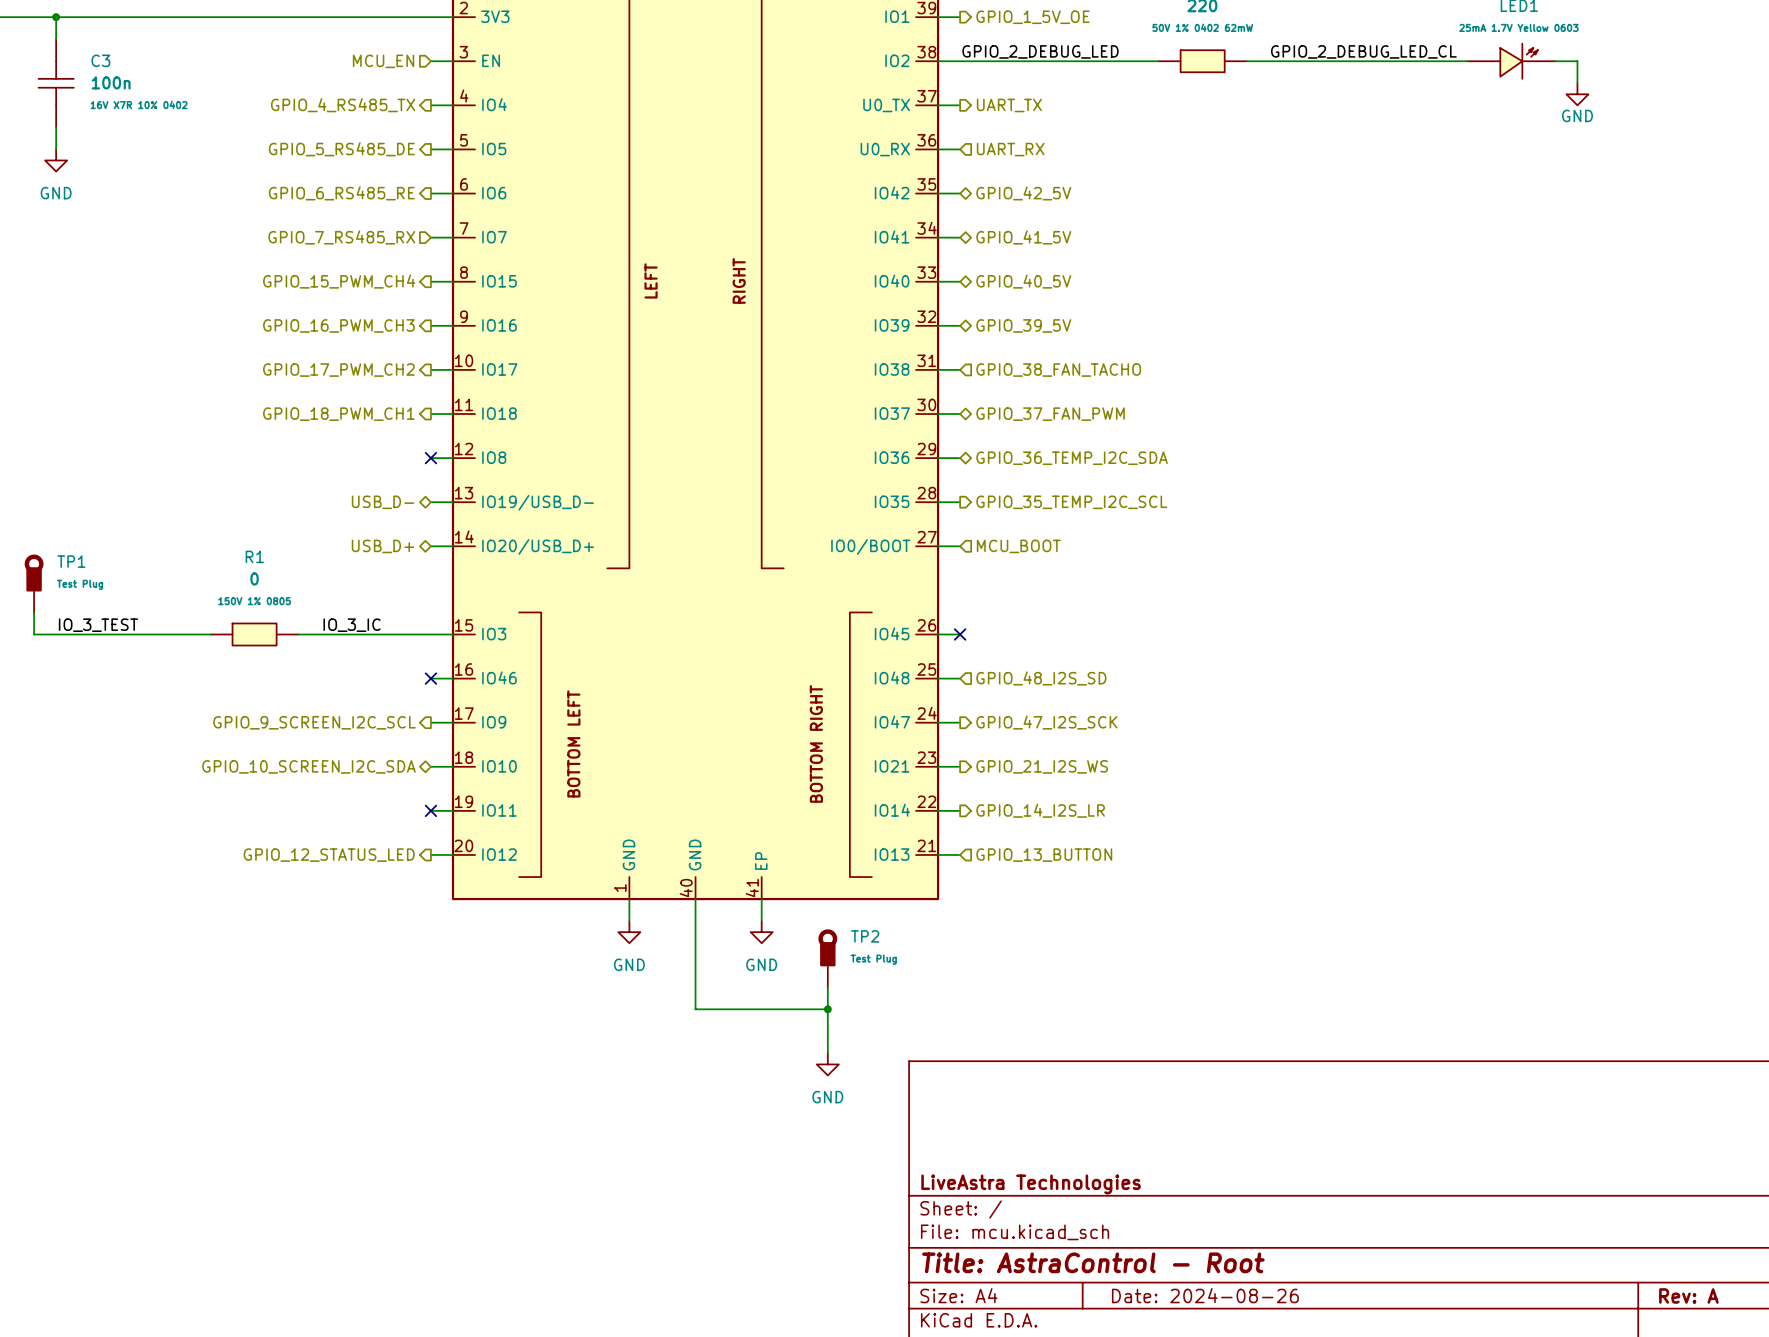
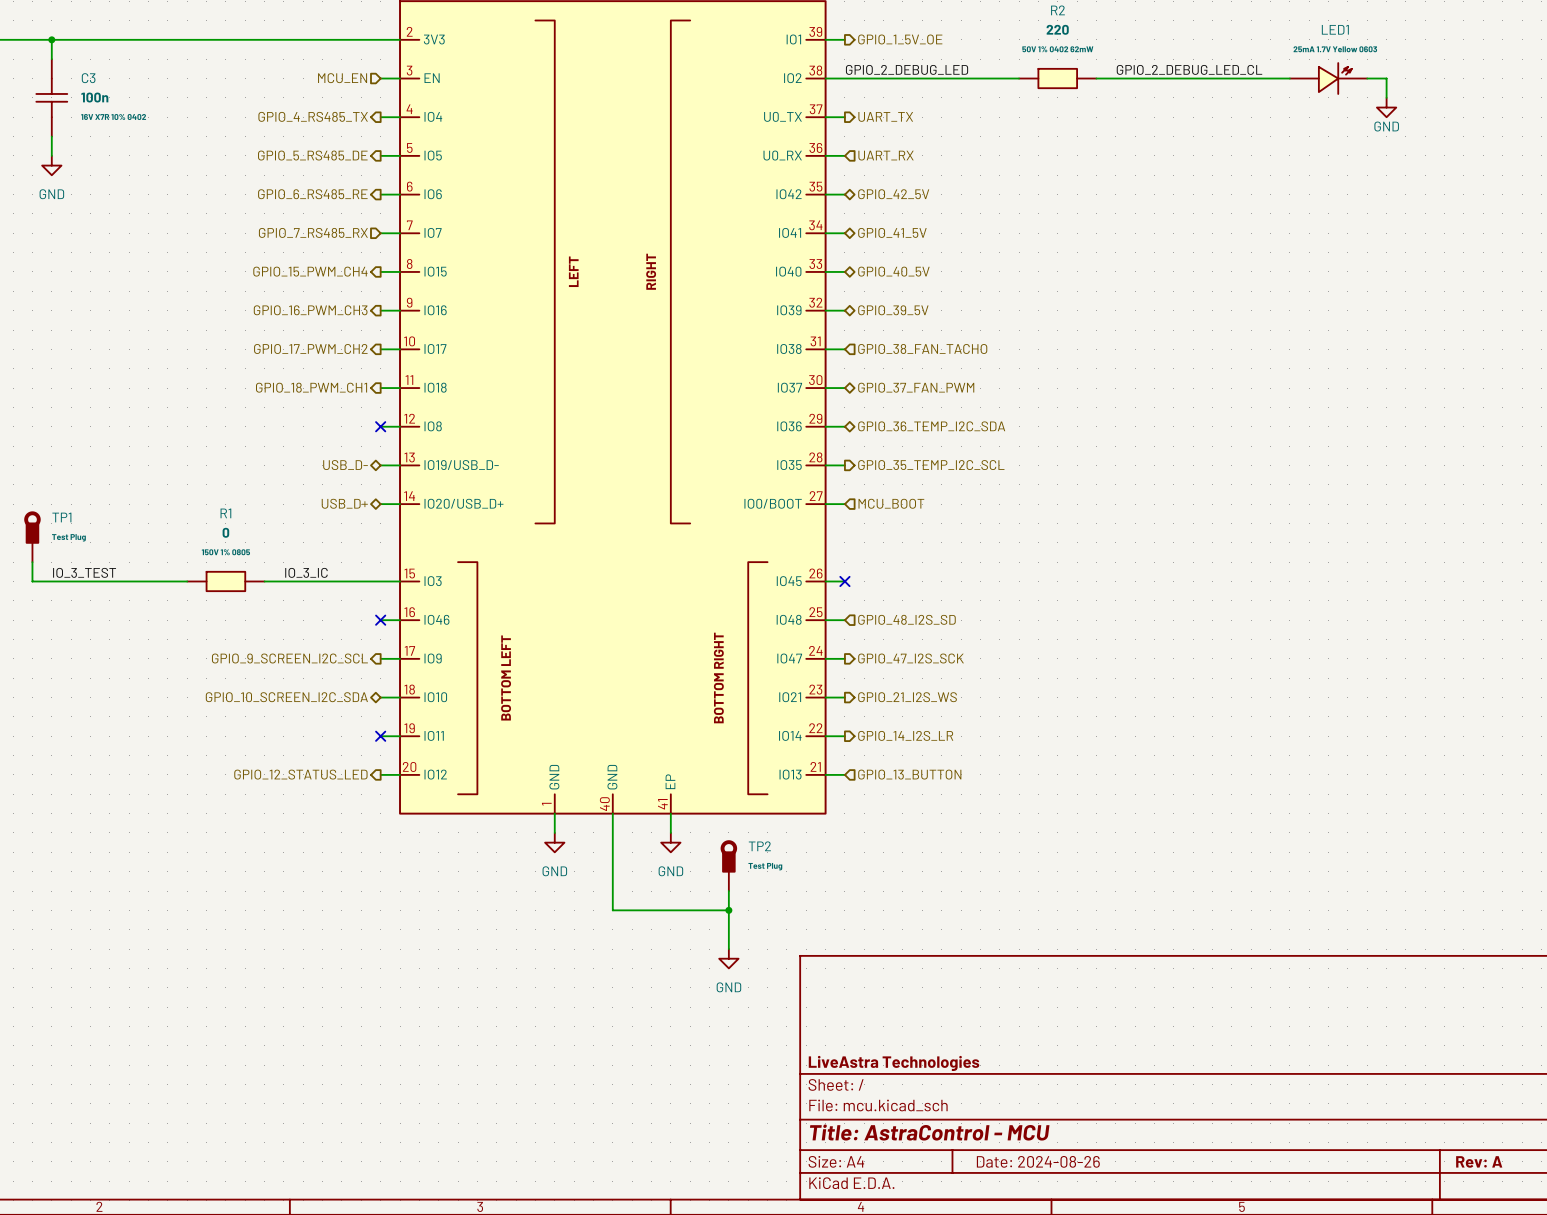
title block: Title: AstraControl - Root (1093, 1262) -> Title: AstraControl - MCU (929, 1132)

